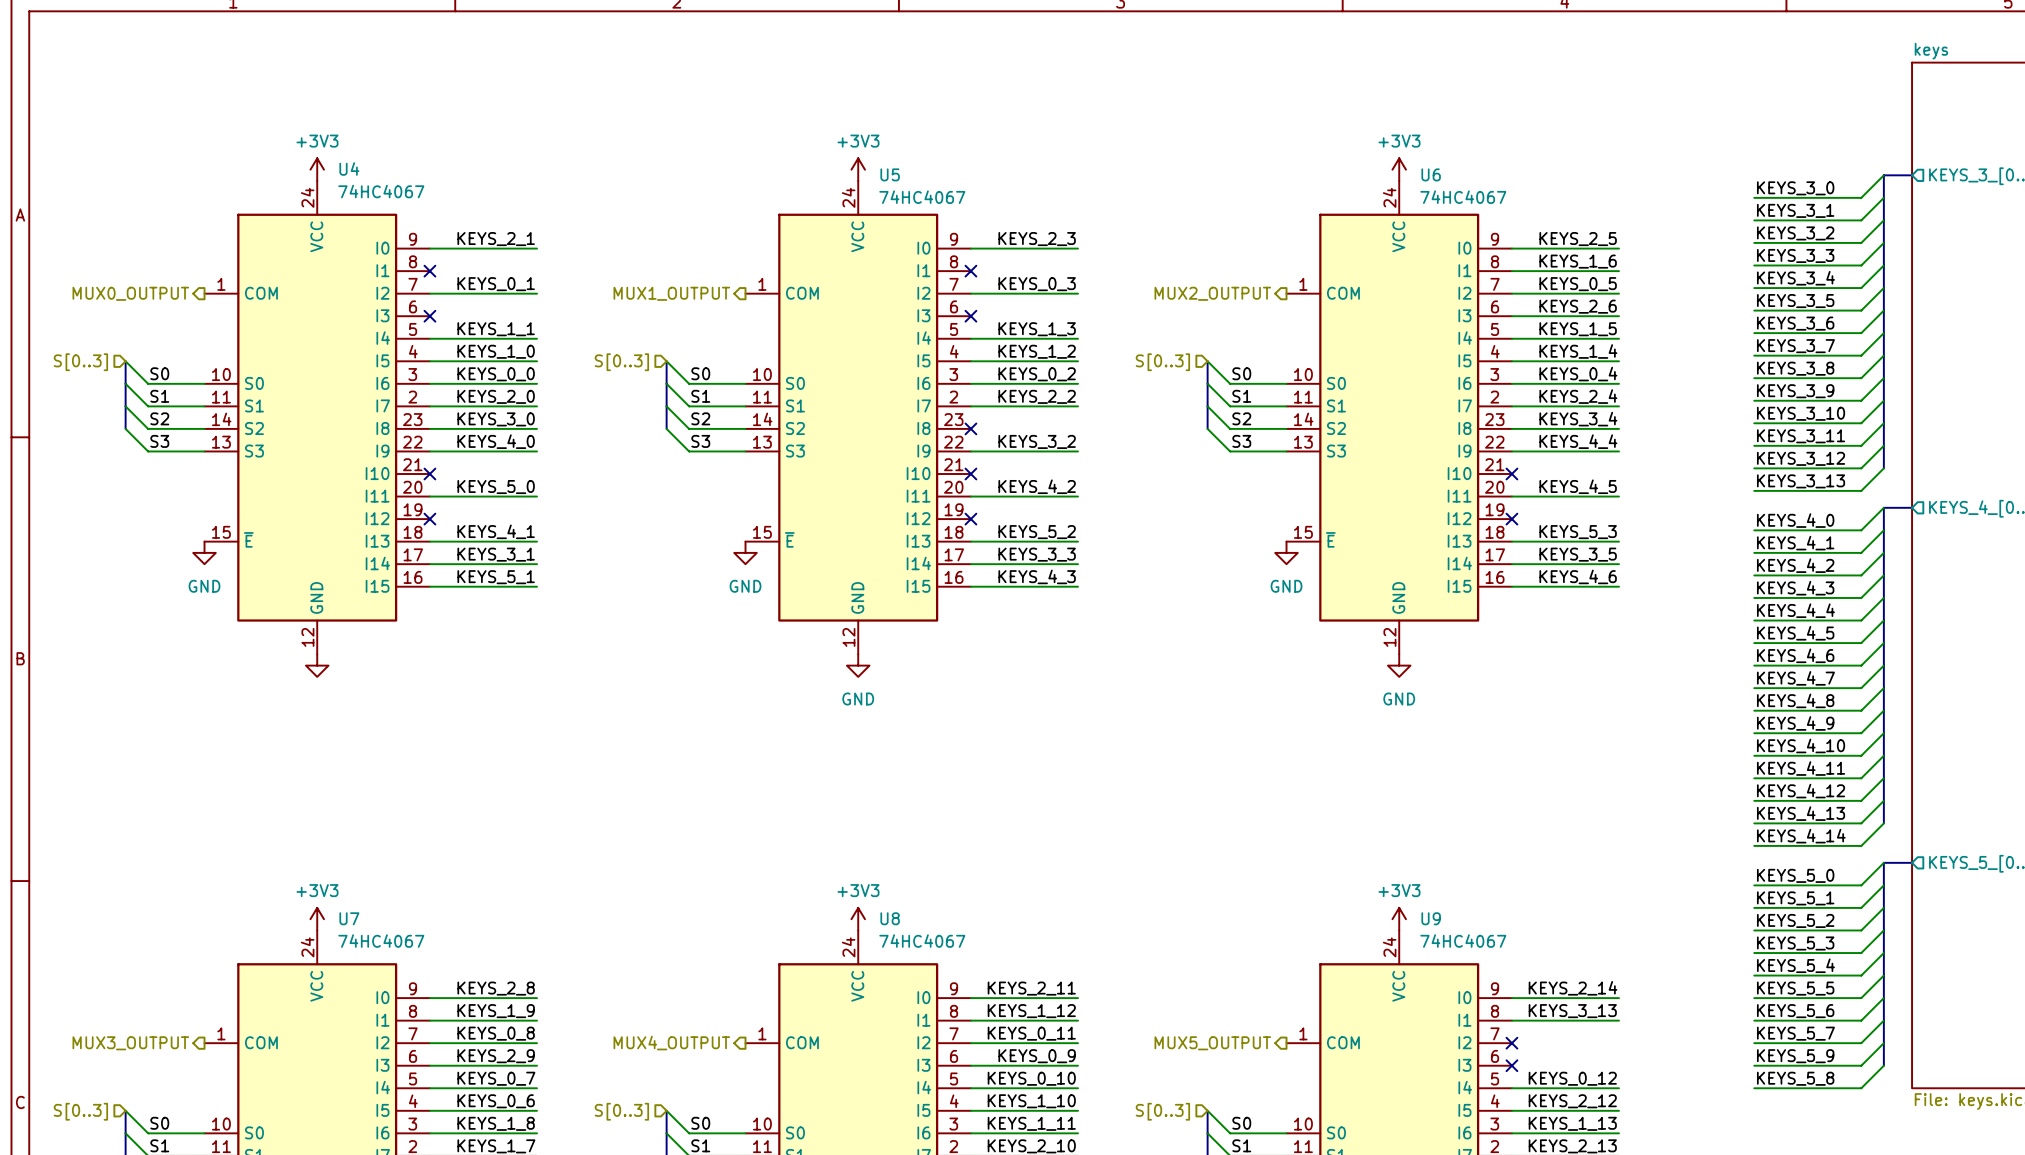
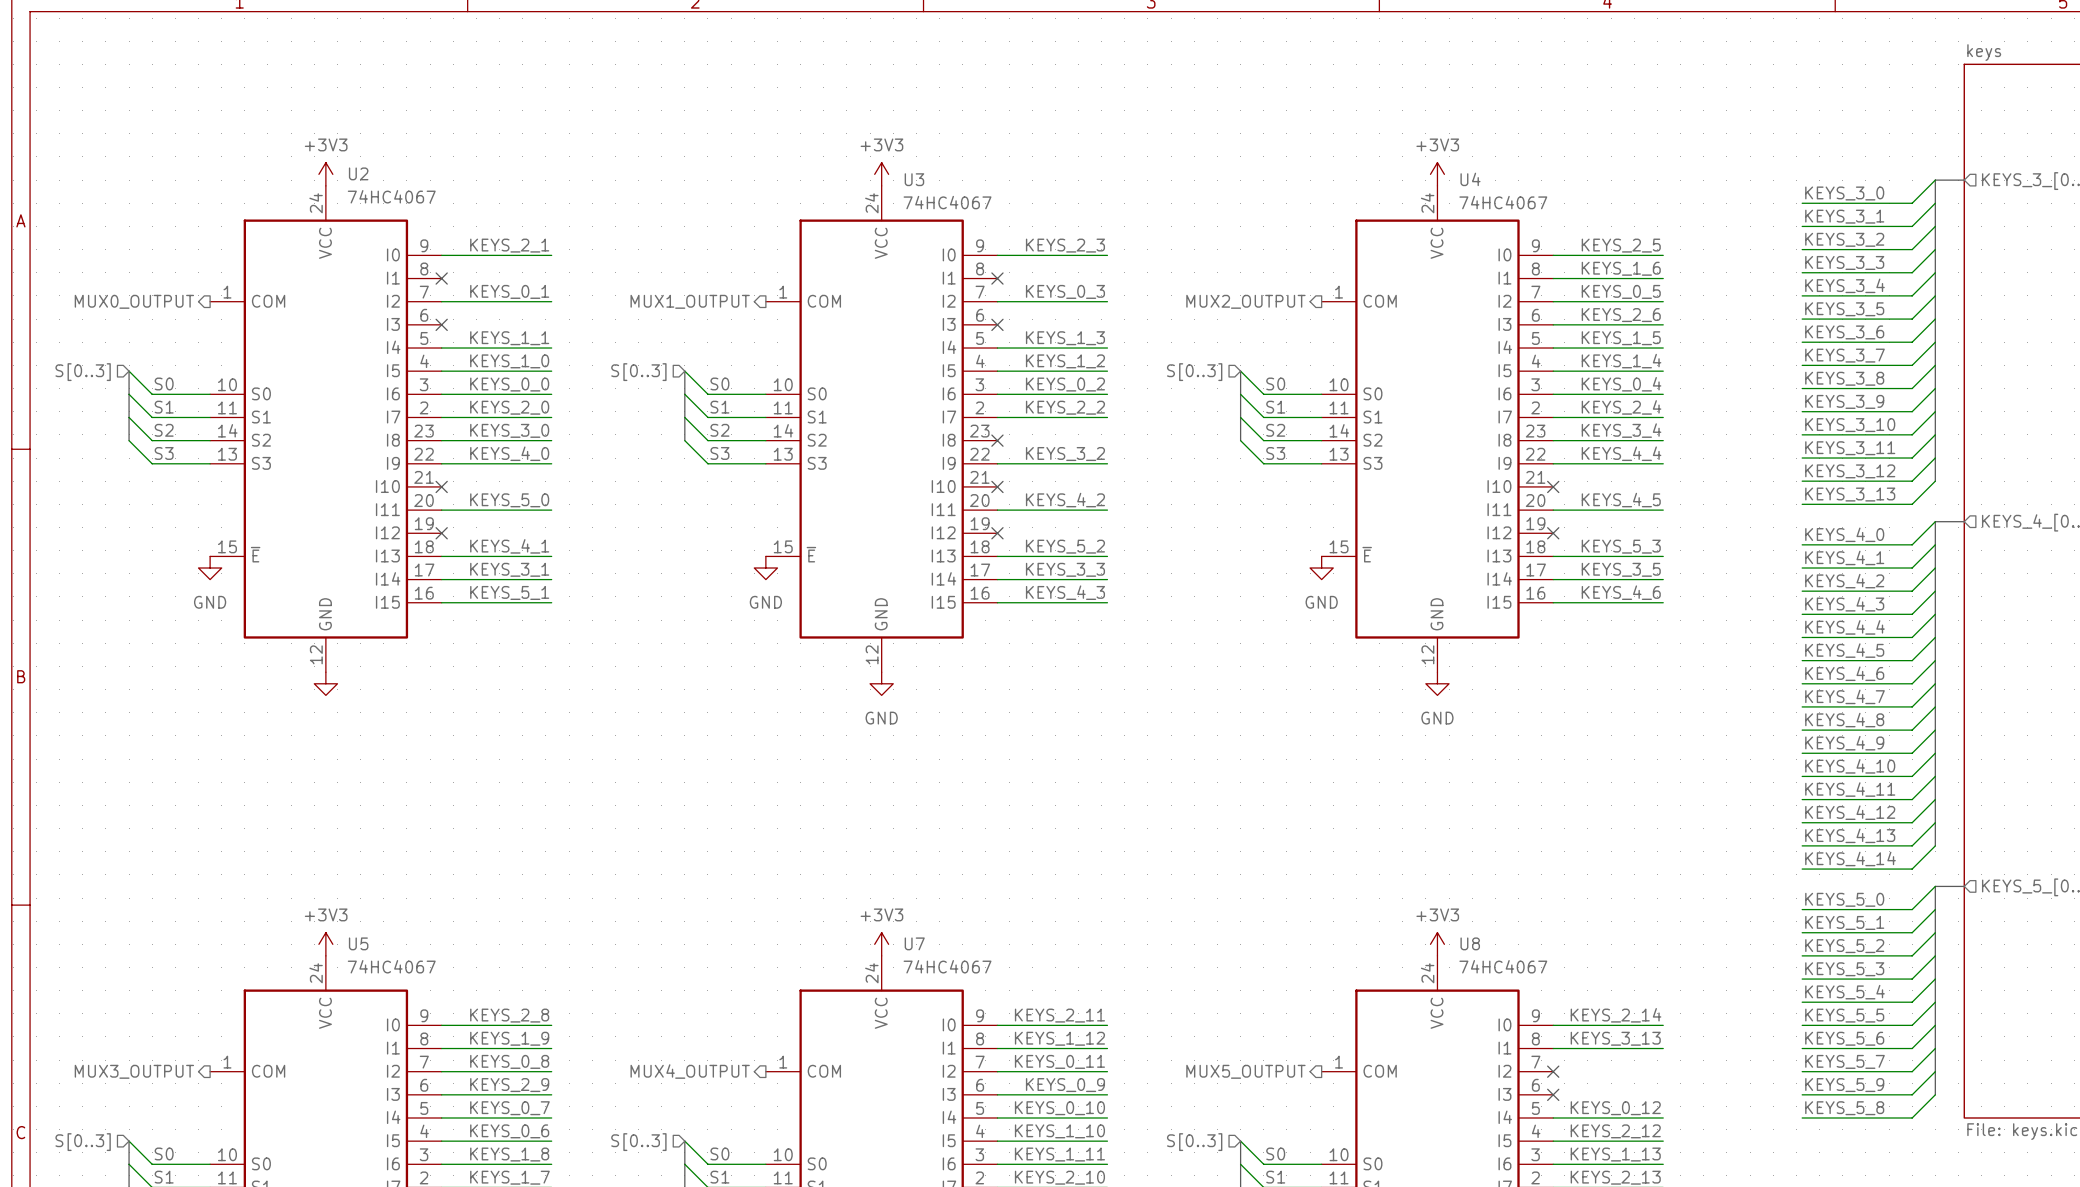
U4 name: U4 (349, 169) -> U2 (358, 173)
U5 name: U5 (890, 174) -> U3 (914, 179)
U6 name: U6 (1431, 174) -> U4 (1470, 179)
U7 name: U7 (349, 918) -> U5 (358, 943)
U8 name: U8 (890, 918) -> U7 (914, 943)
U9 name: U9 (1431, 918) -> U8 (1470, 943)

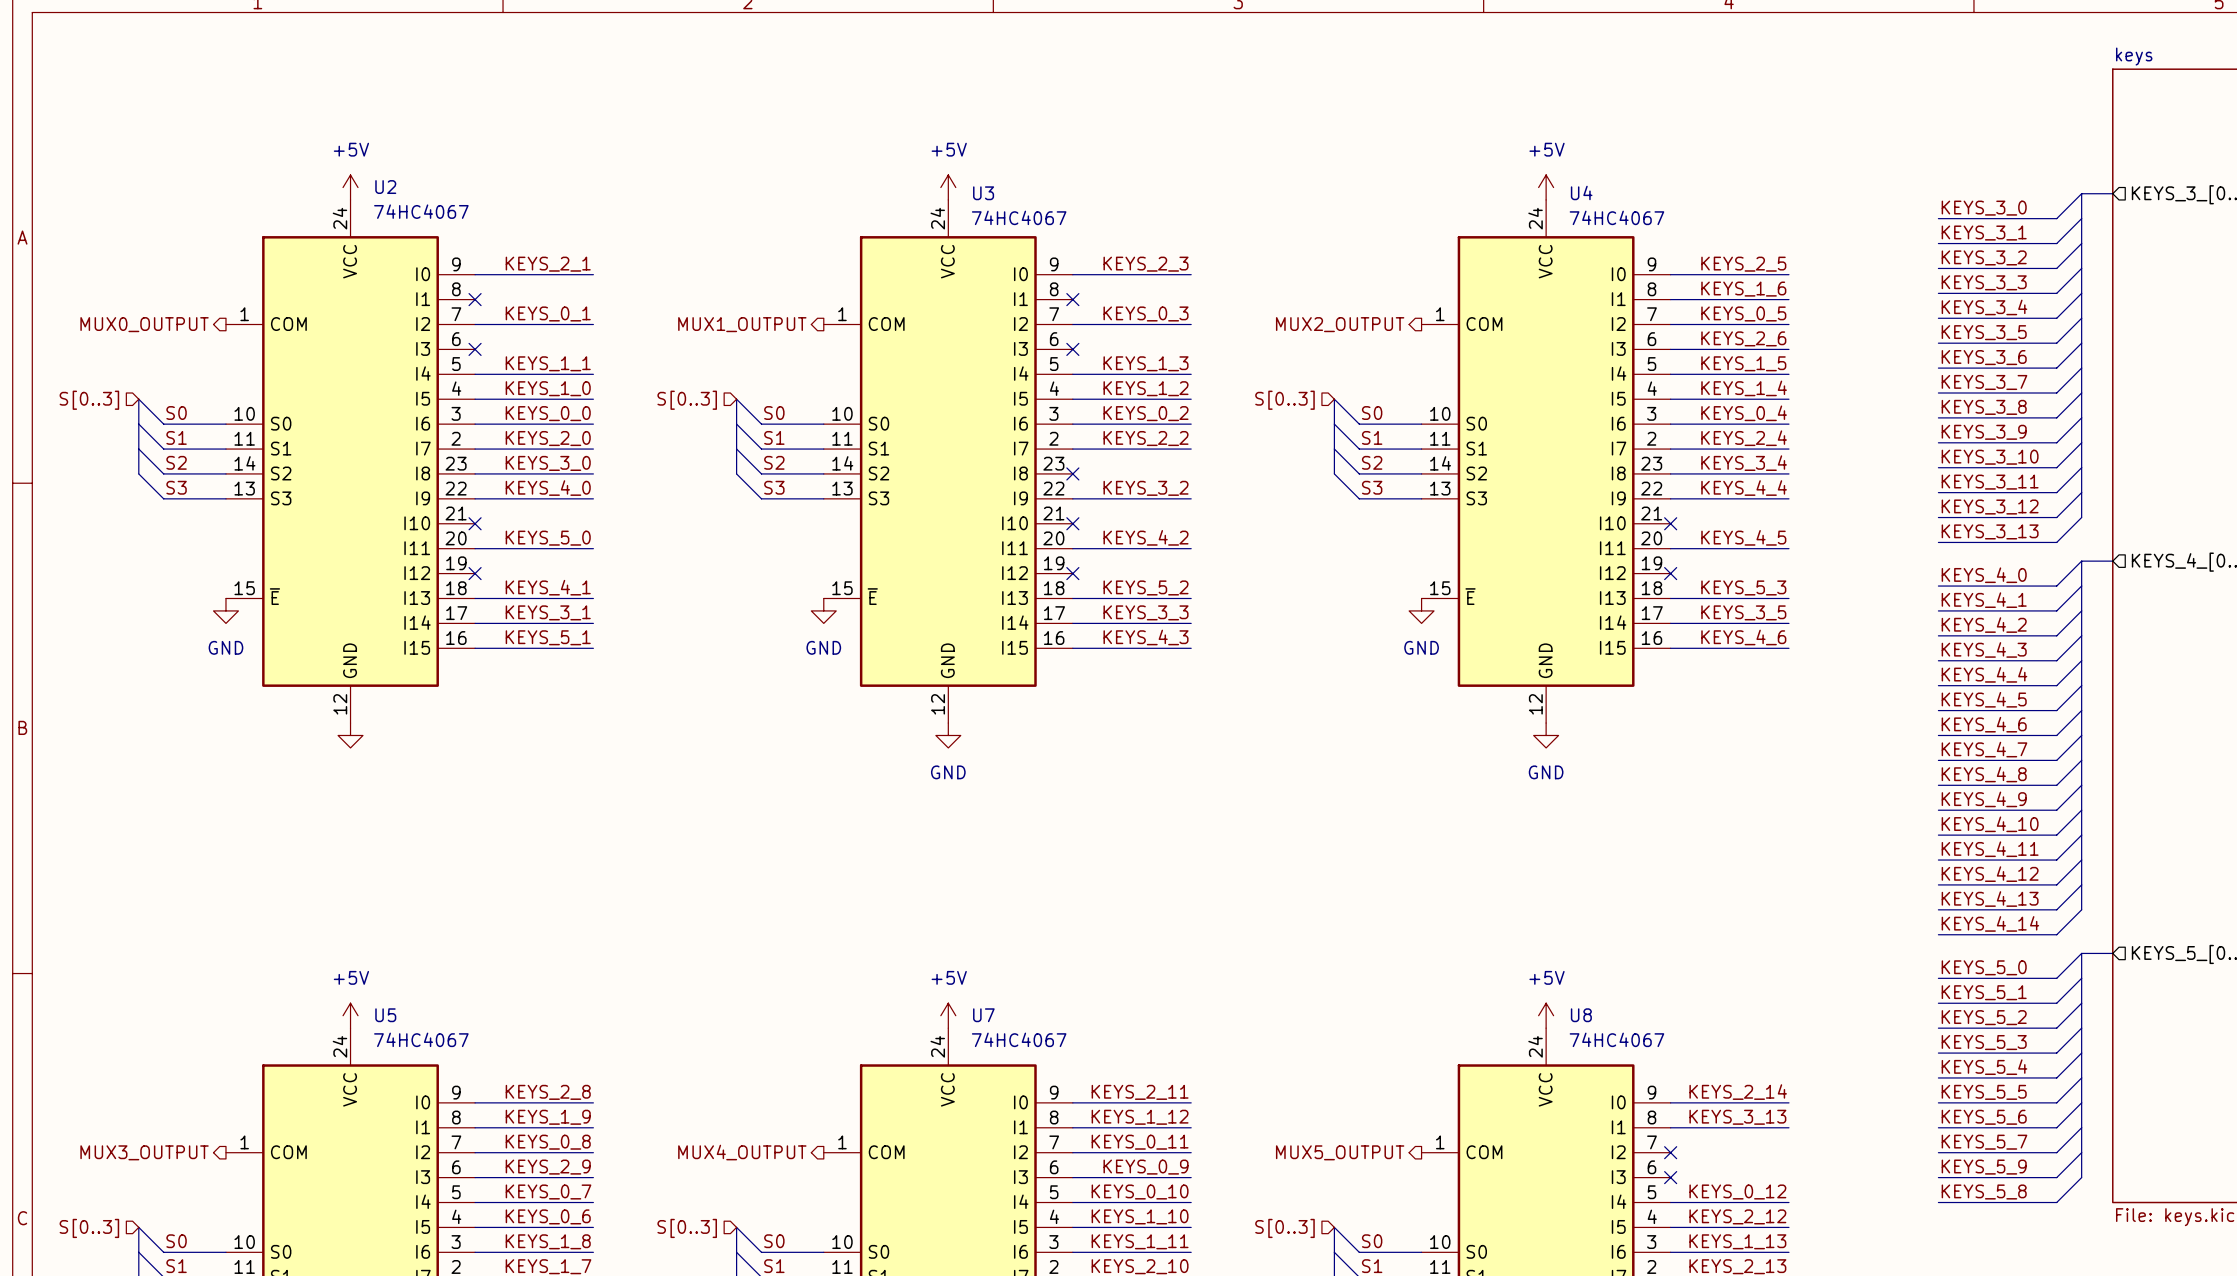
power symbol: +3V3 (325, 174) -> +5V (350, 187)
power symbol: +3V3 (881, 174) -> +5V (948, 187)
power symbol: +3V3 (1437, 174) -> +5V (1546, 187)
power symbol: +3V3 (325, 944) -> +5V (350, 1015)
power symbol: +3V3 (881, 944) -> +5V (948, 1015)
power symbol: +3V3 (1437, 944) -> +5V (1546, 1015)

